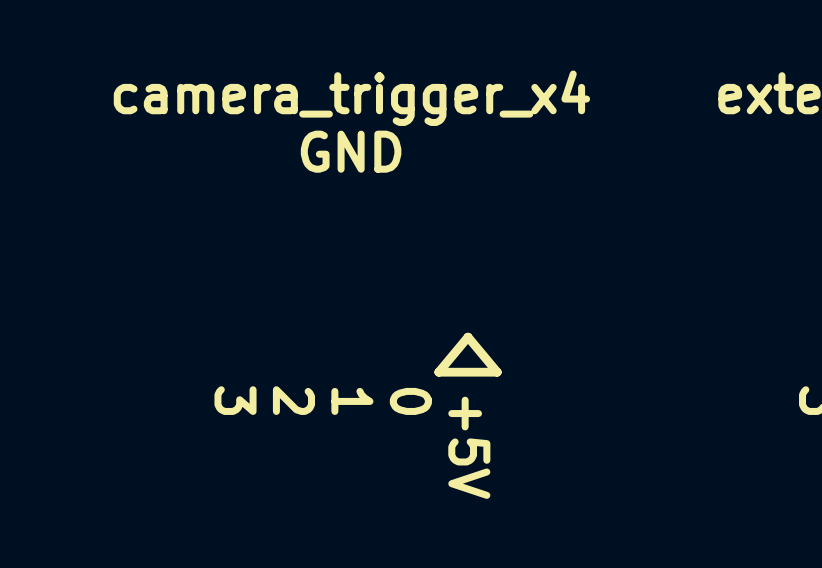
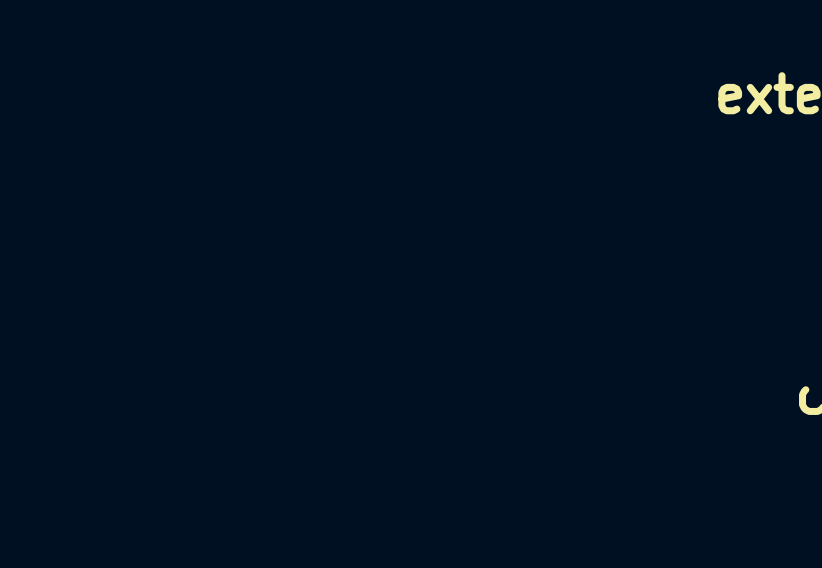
text: camera_trigger_x4 (351, 98) -> none
text: GND (351, 151) -> none
line: (468, 337) (438, 372) (497, 372) (468, 337) -> none
text: 3 (235, 400) -> none
text: 2 (293, 400) -> none
text: 1 (352, 401) -> none
text: 0 (410, 401) -> none
text: +5V (469, 447) -> none

